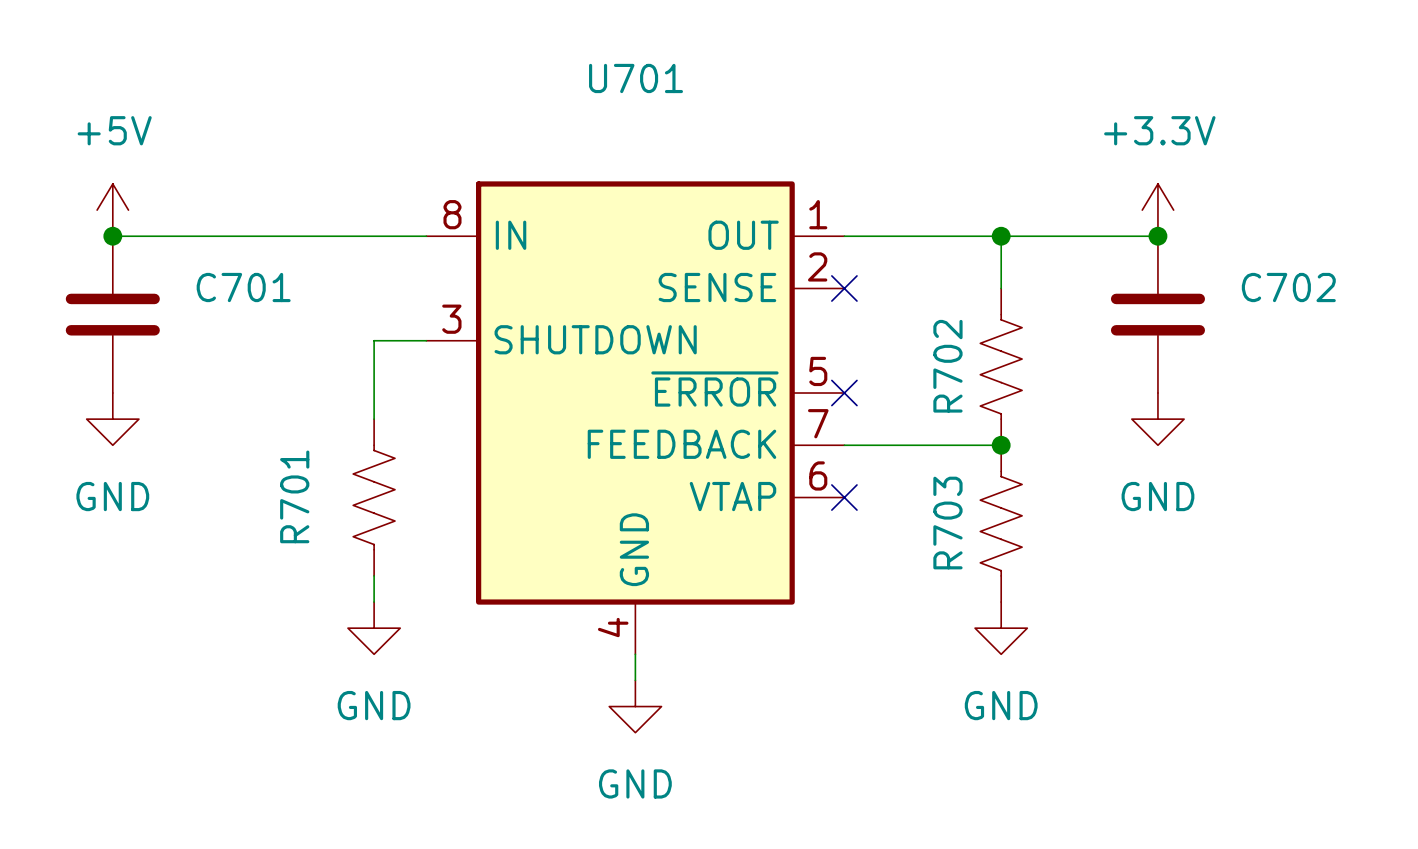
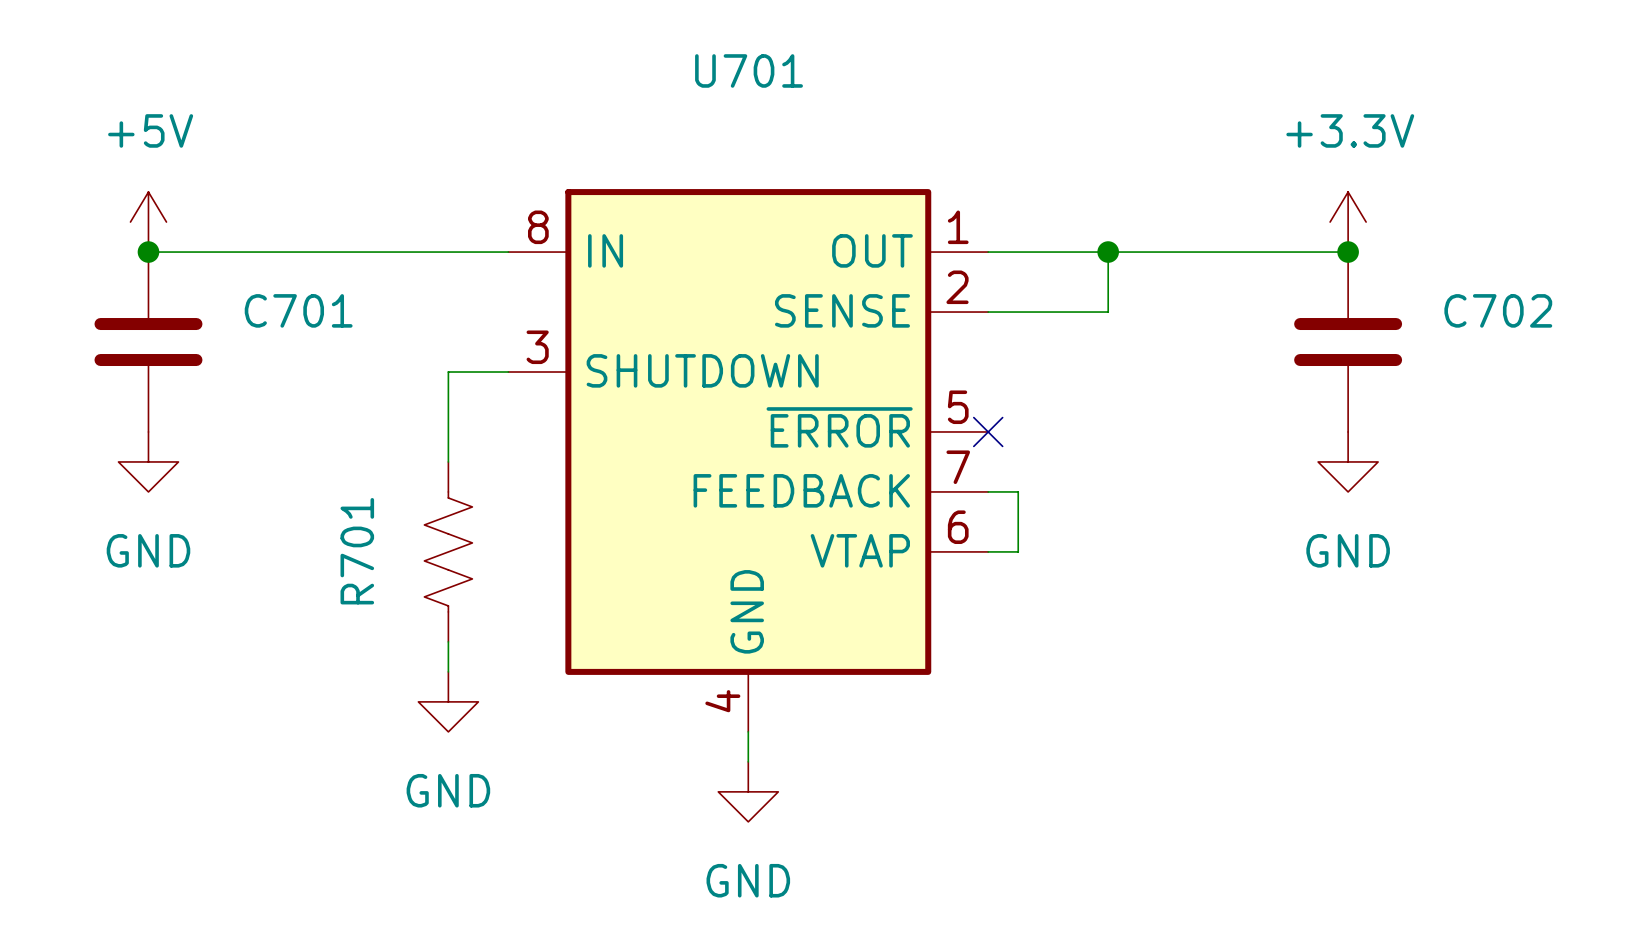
wire: none -> (1108, 252) (1108, 312) (988, 312)
wire: (1001, 236) (1001, 288) -> none
junction position: (1001, 236) -> (1108, 252)
no-connect mark: (844, 288) -> none
R702: (1001, 366) -> none
wire: (870, 445) (1001, 445) -> (1018, 491) (1018, 551) (988, 551)
junction: (1001, 445) -> none
no-connect mark: (844, 497) -> none
R703: (1001, 523) -> none
power symbol: GND (1001, 628) -> none

